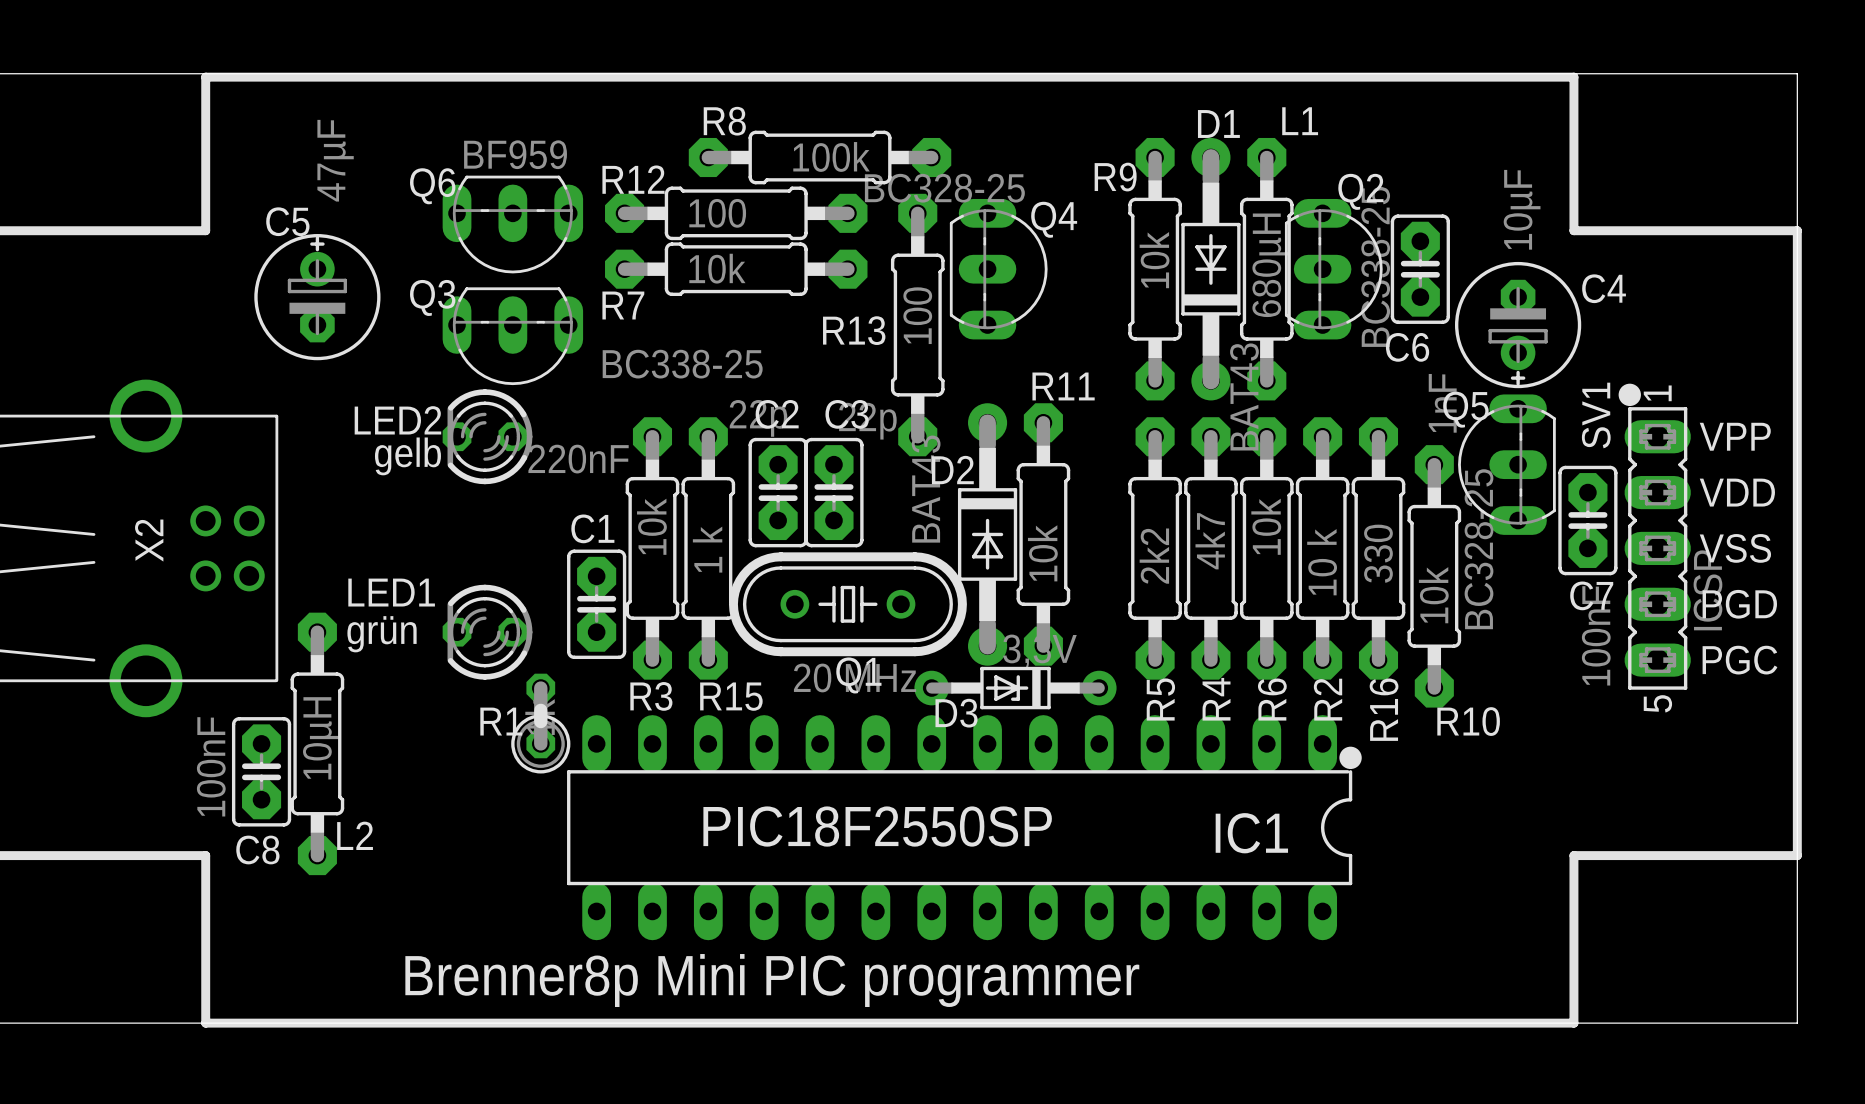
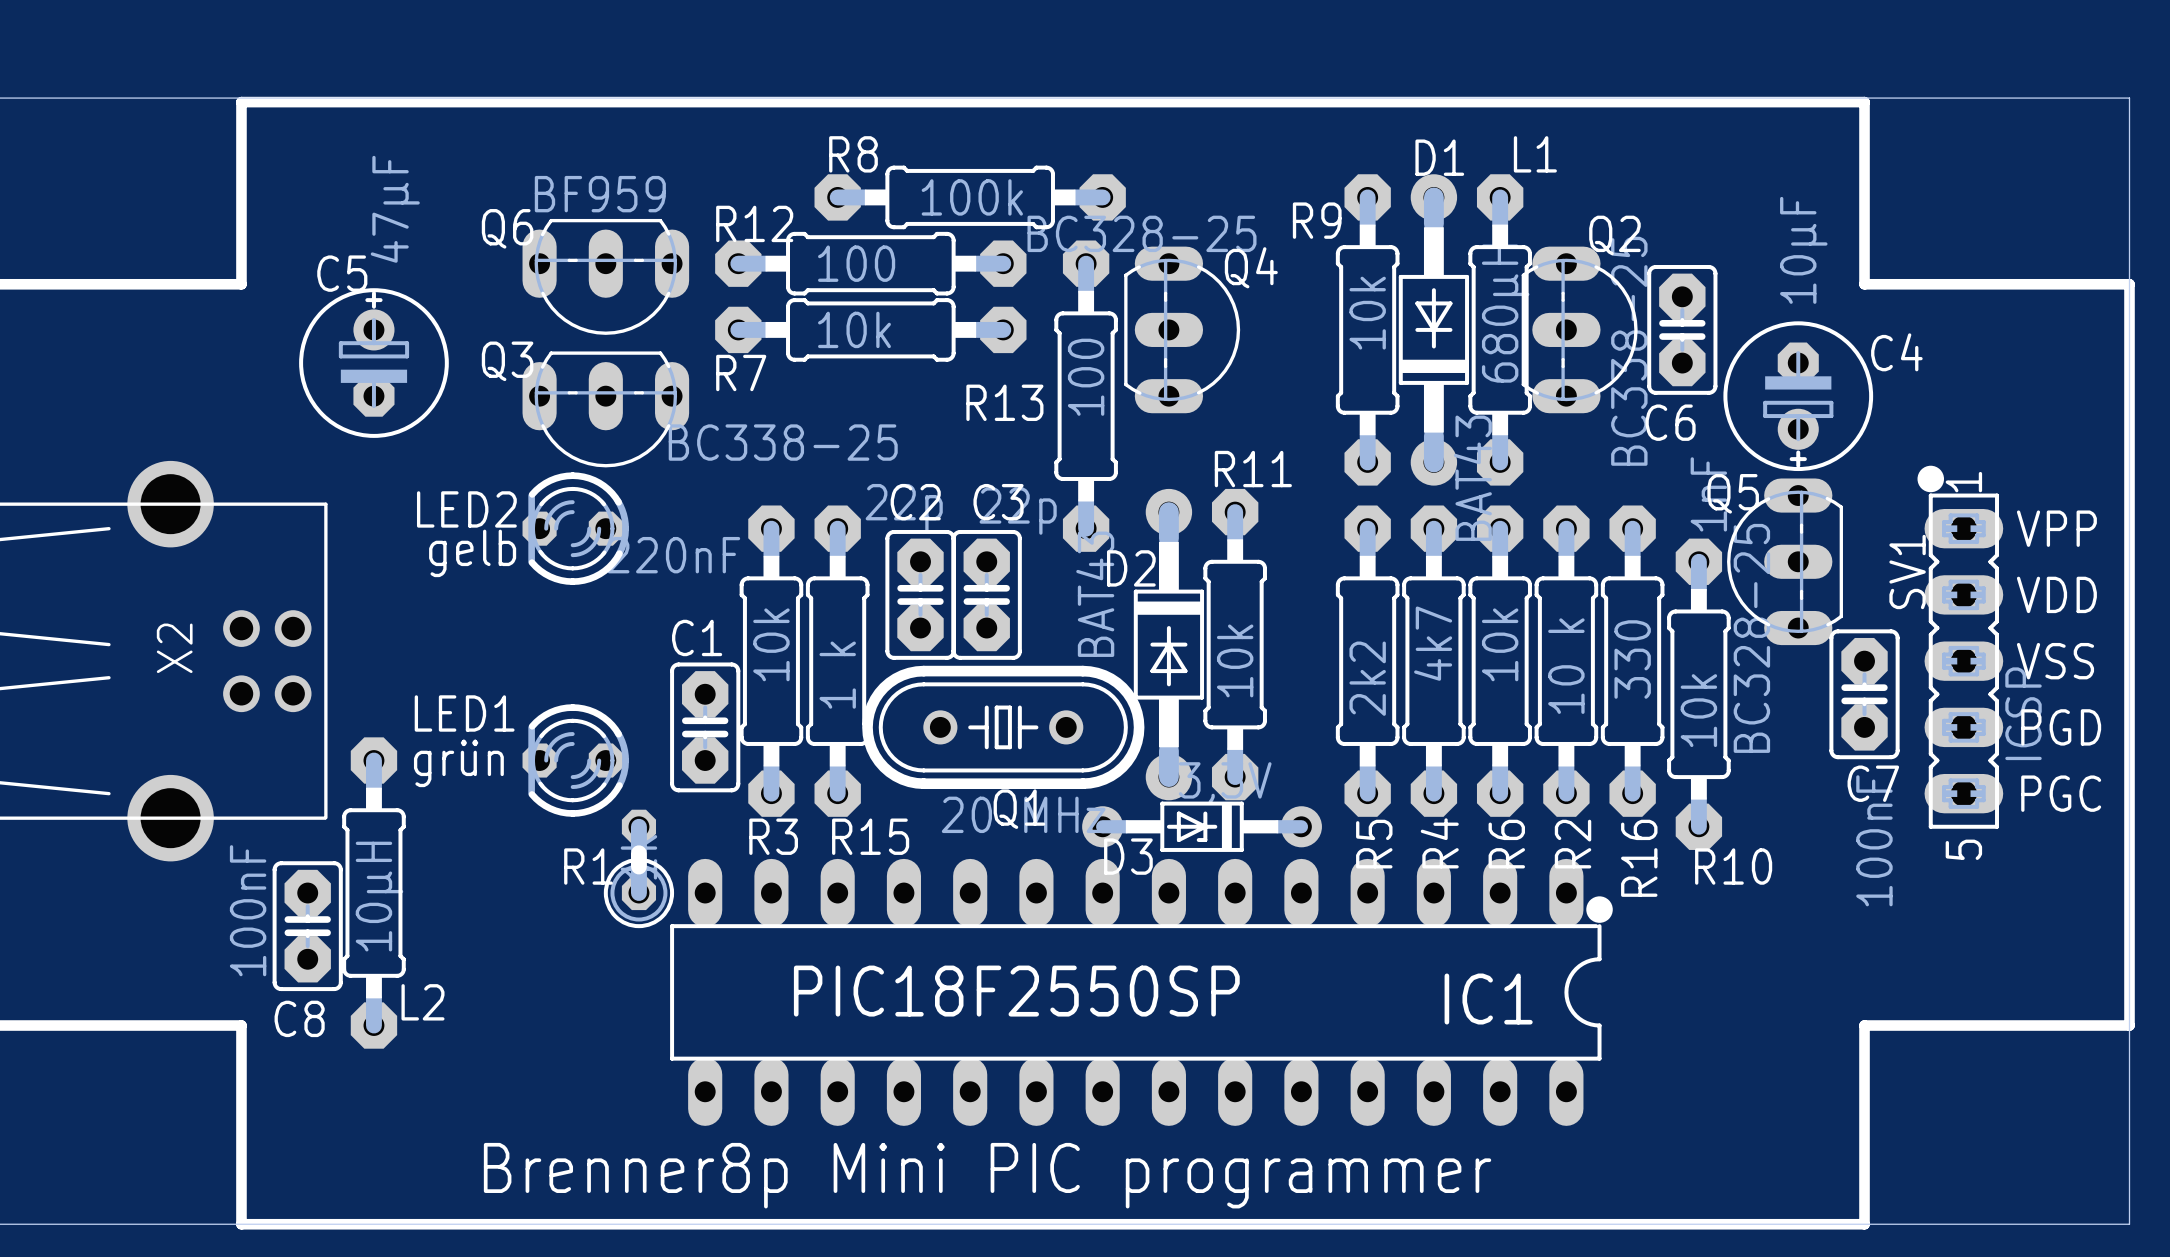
SV1 name position: SV1 (1596, 415) -> SV1 (1907, 572)
C7 position: (1587, 520) -> (1864, 694)

